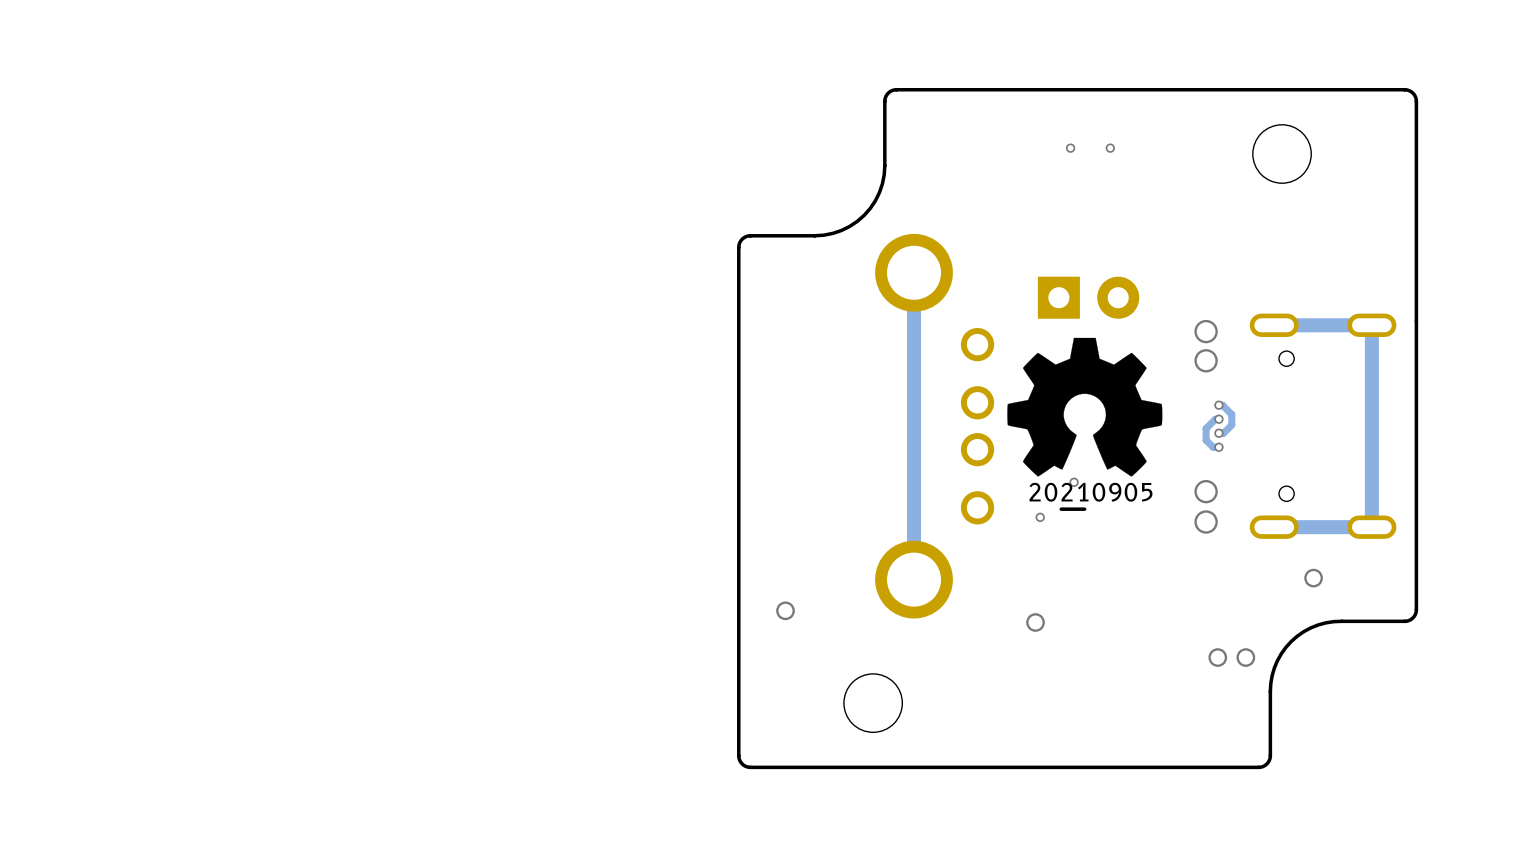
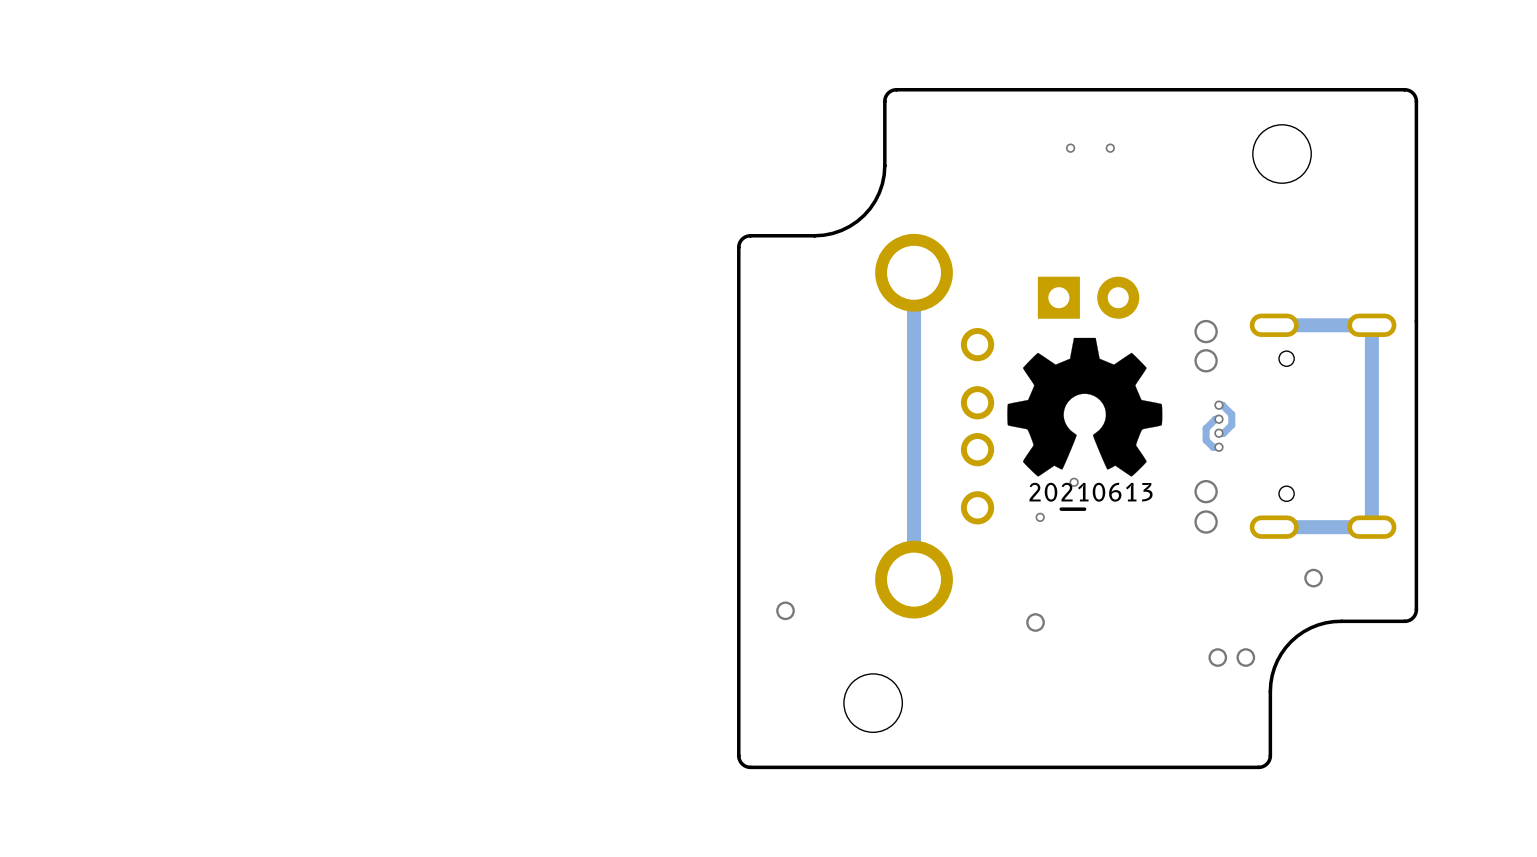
drawing shape: [1029, 482, 1153, 511] -> [1029, 482, 1153, 511]

